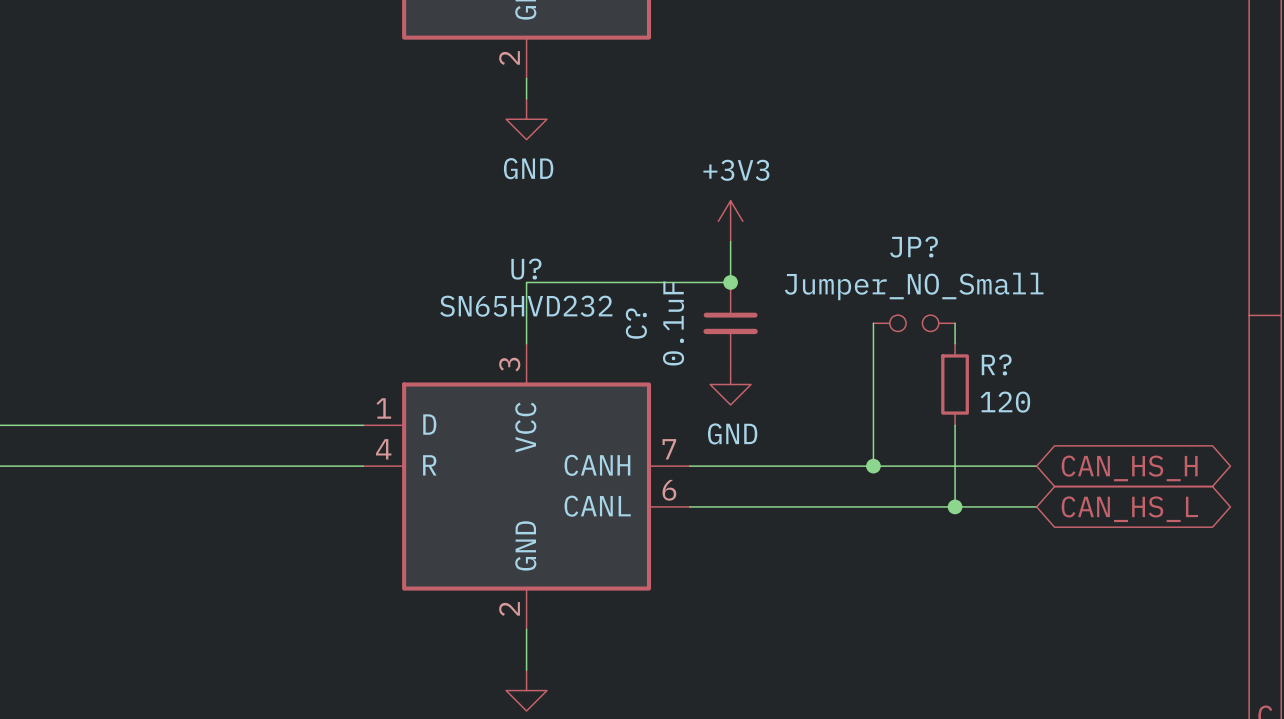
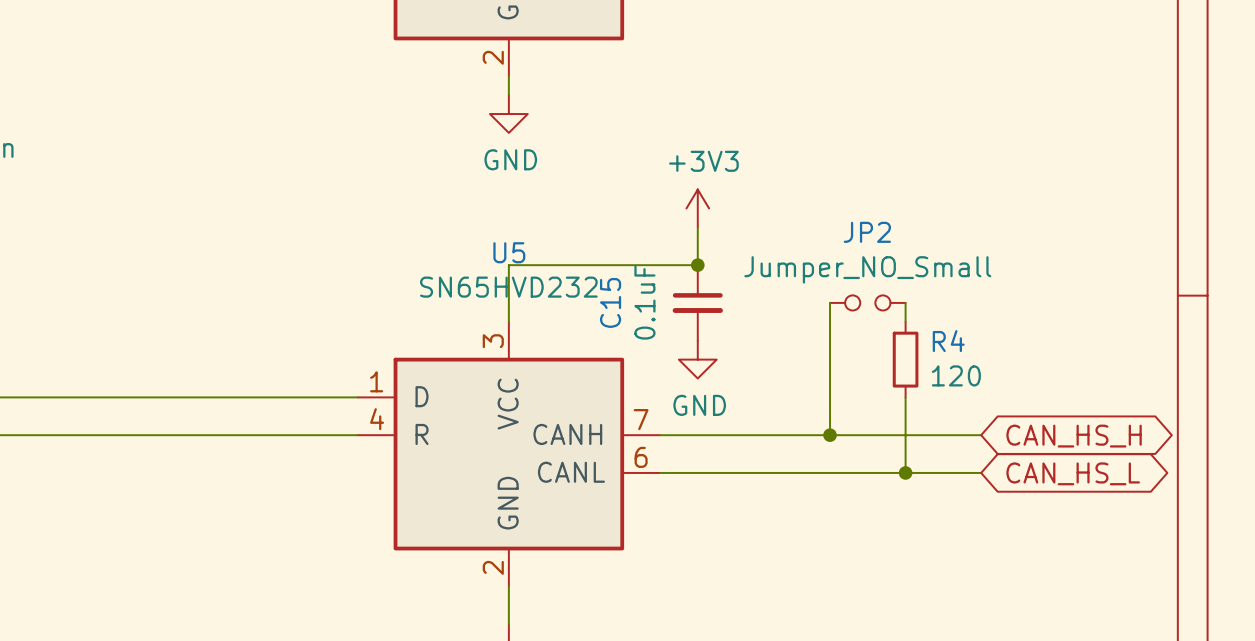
JP? name: JP? (914, 247) -> JP2 (867, 232)
U? name: U? (526, 269) -> U5 (509, 252)
C? name: C? (636, 323) -> C15 (610, 302)
R? name: R? (996, 364) -> R4 (948, 341)

